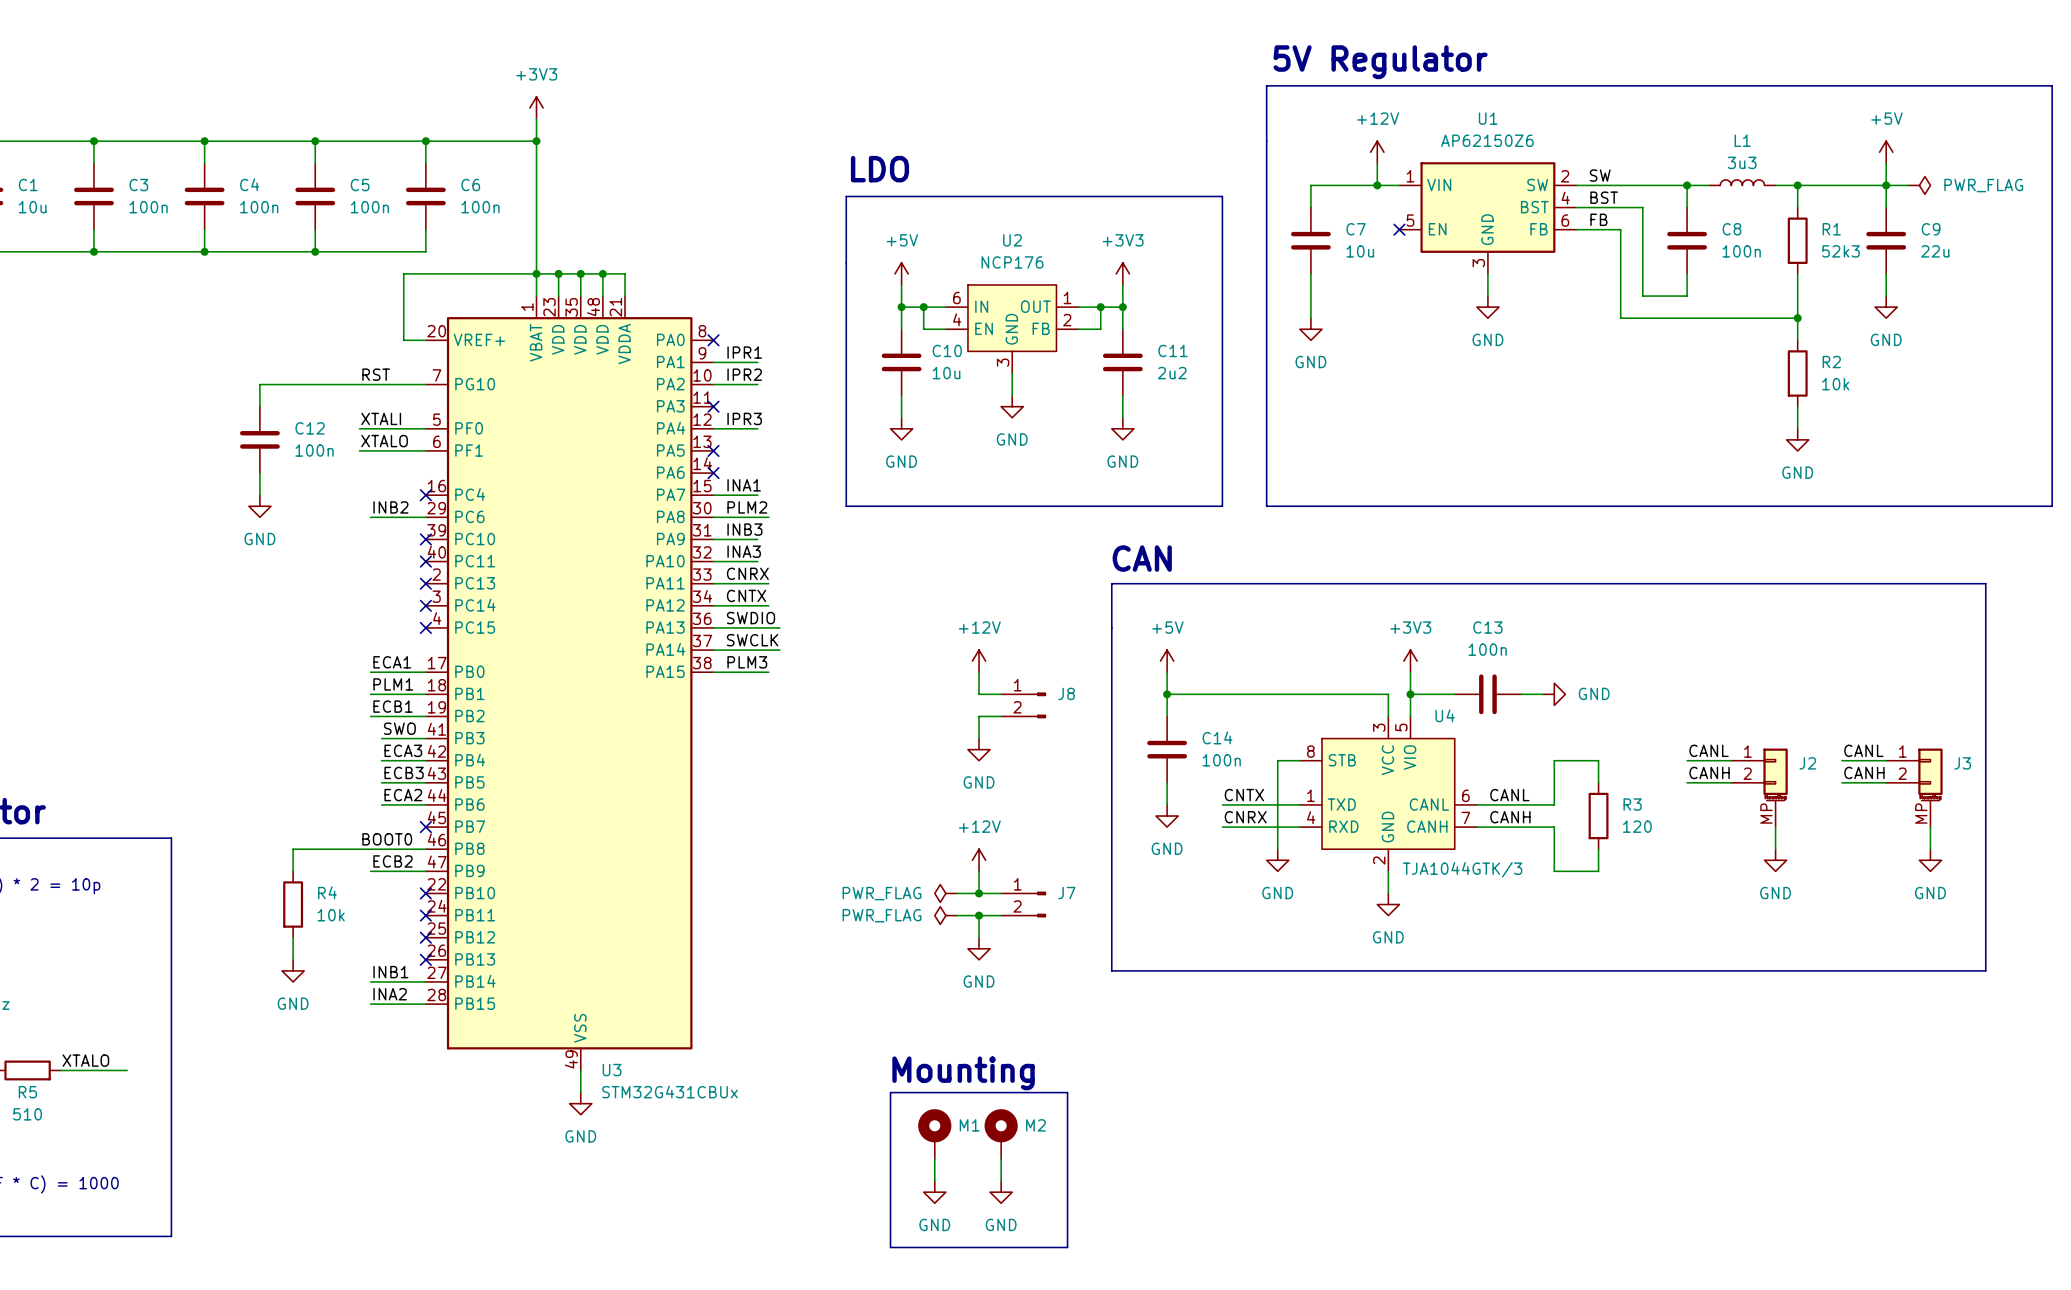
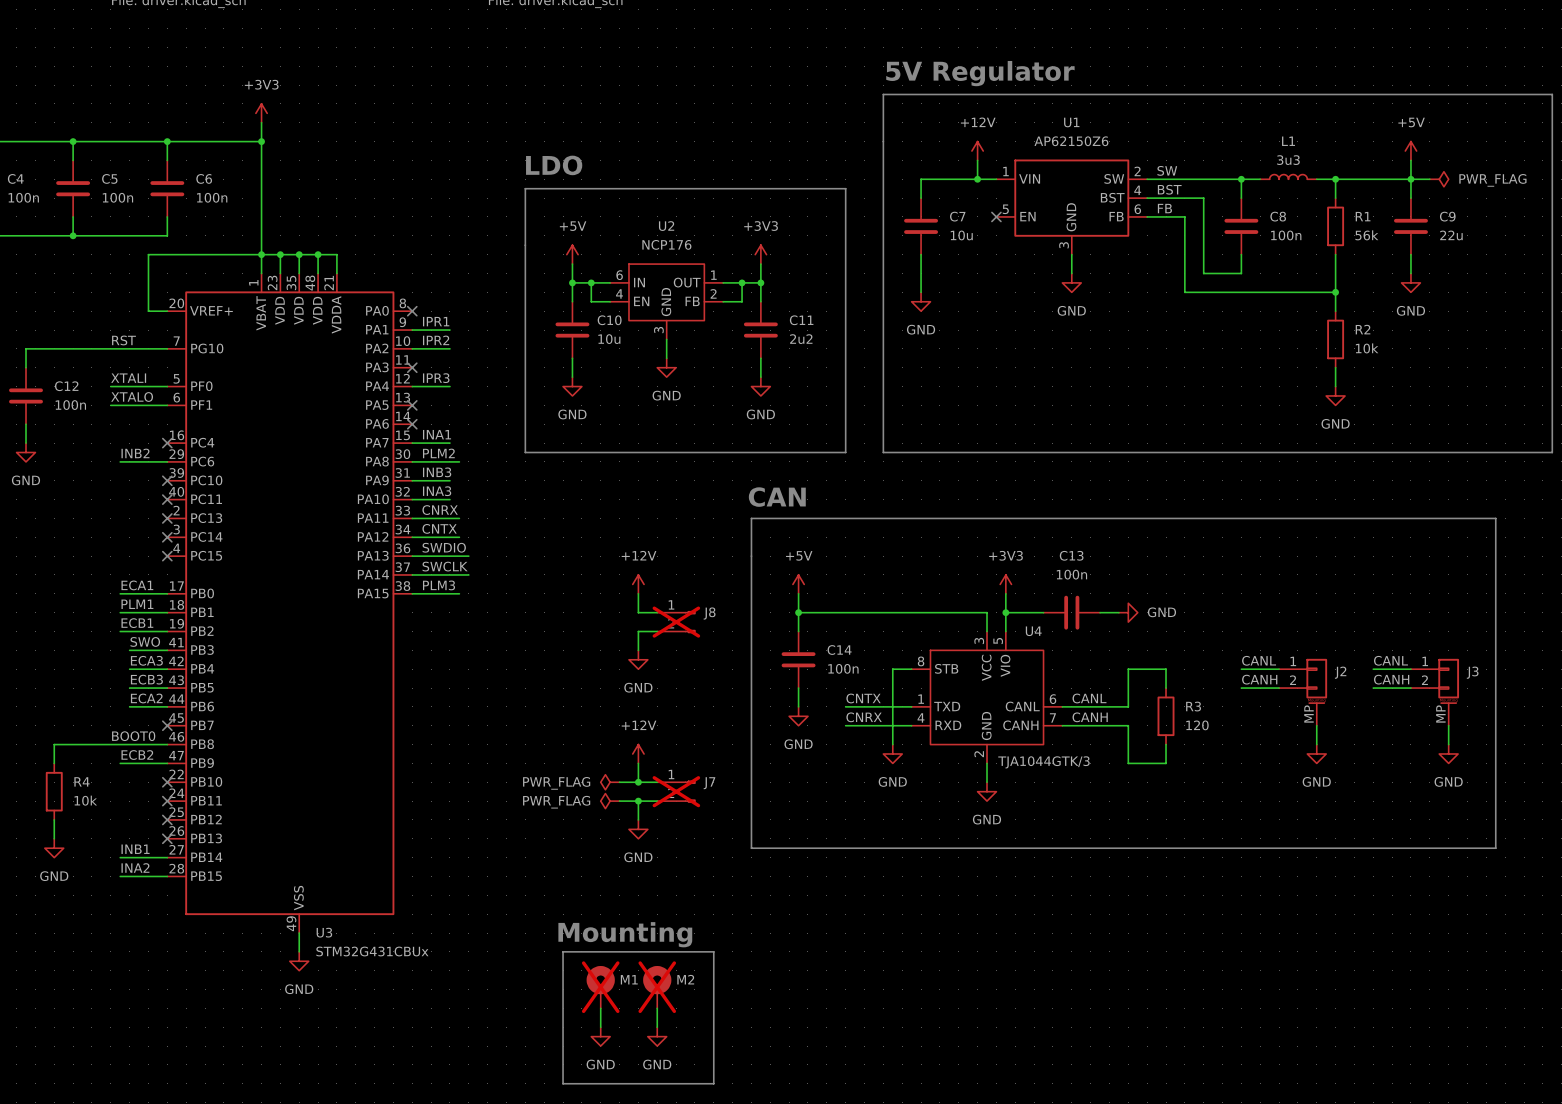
R1 value: 52k3 (1840, 251) -> 56k (1366, 235)
J8 do-not-place cross: none -> (676, 622)
J7 do-not-place cross: none -> (676, 791)
M1 do-not-place cross: none -> (600, 987)
M2 do-not-place cross: none -> (657, 987)

